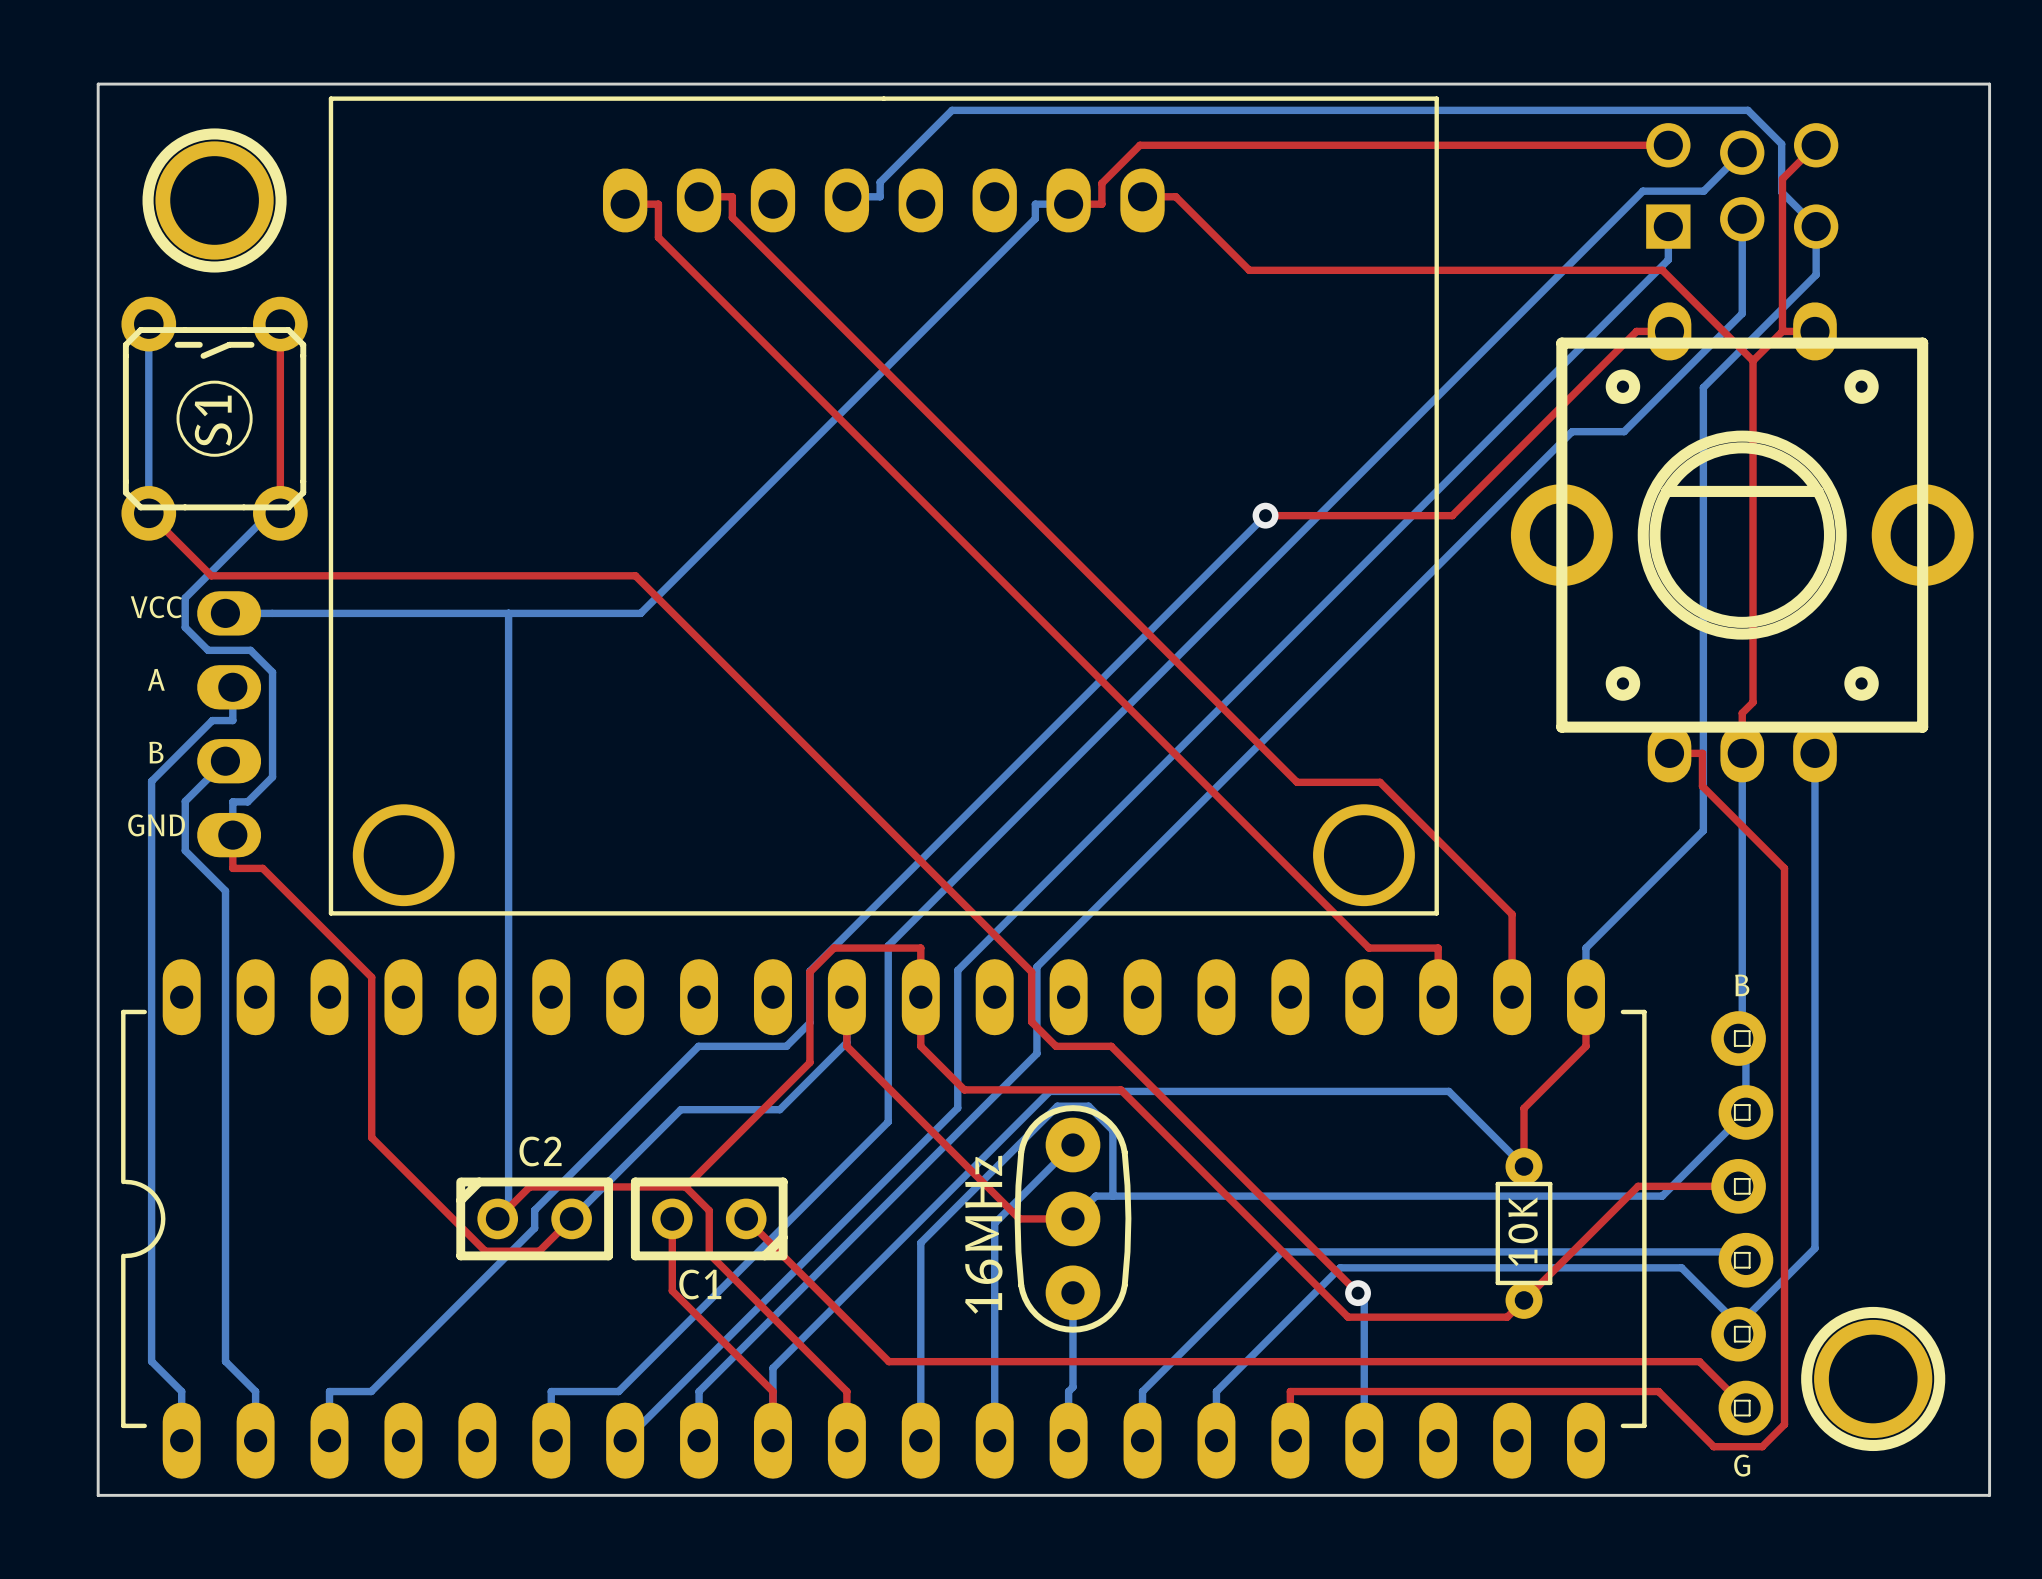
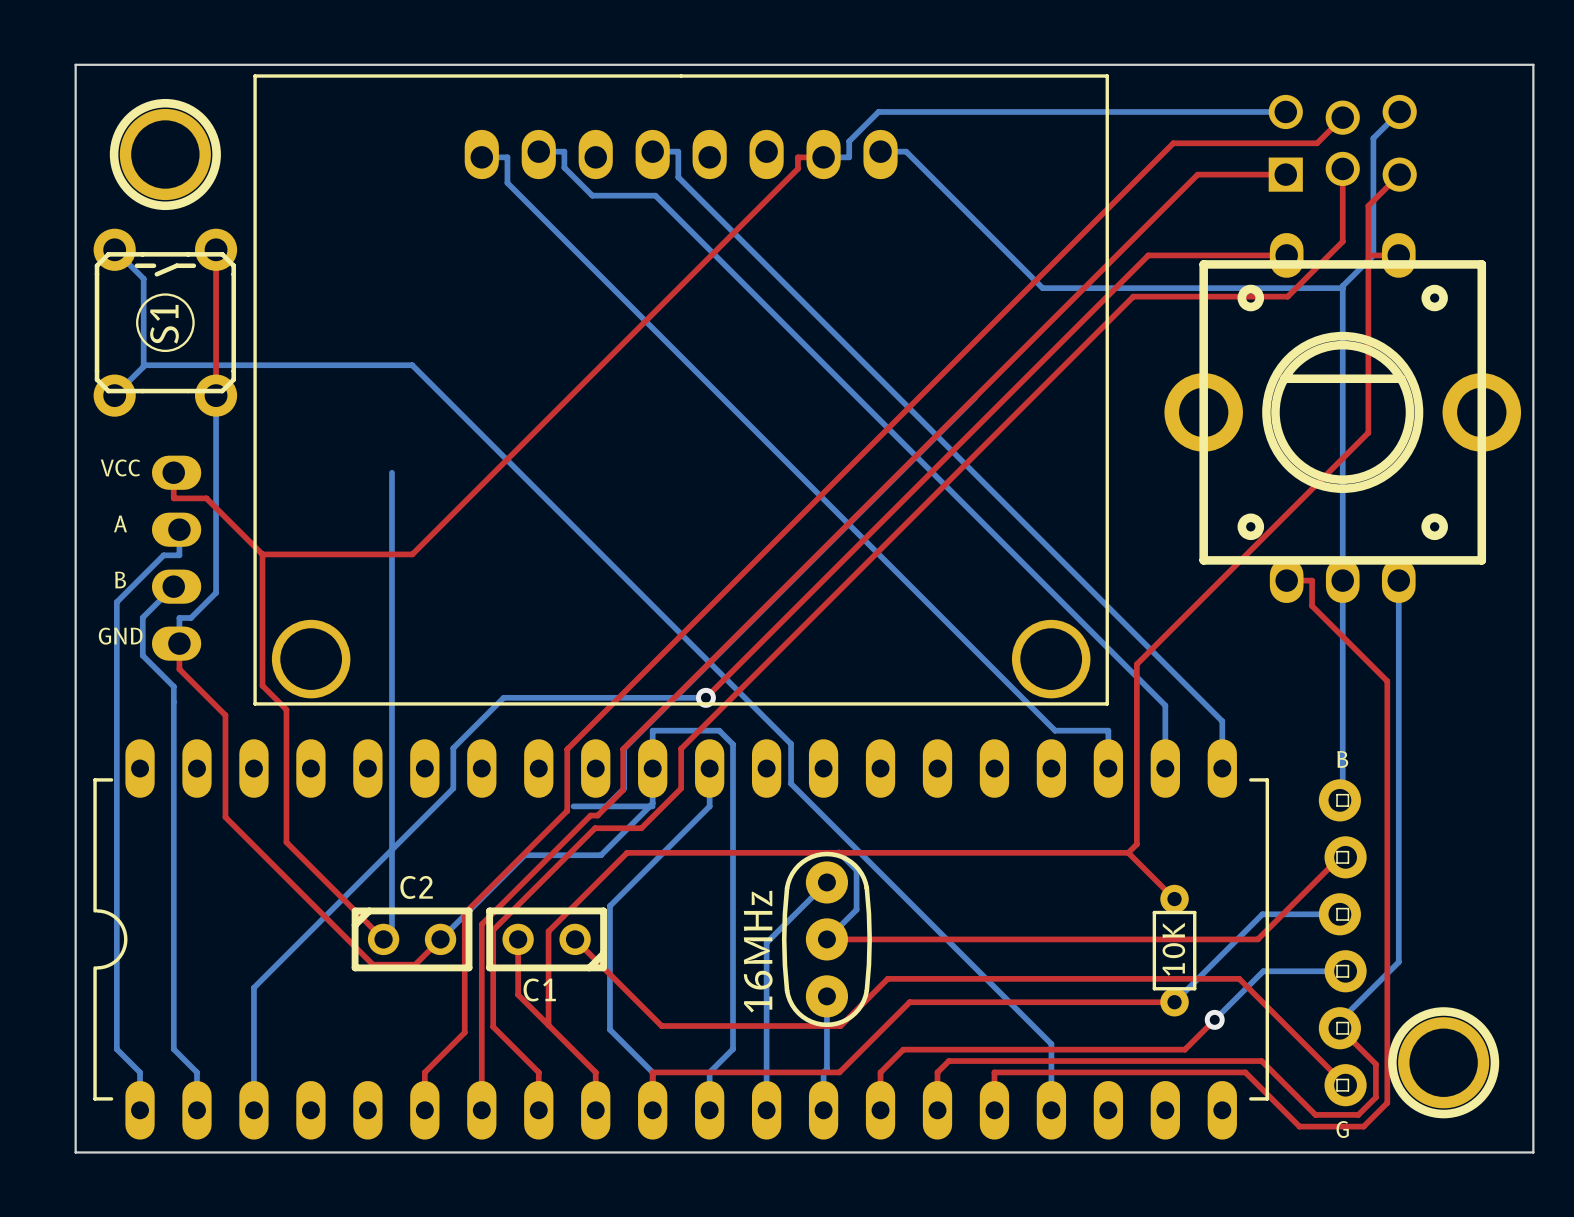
top track: (1668, 145) (1139, 145) (1101, 183) (1101, 204) (1068, 204) -> (262, 554) (412, 554) (797, 168) (797, 157) (823, 157)
bottom track: none -> (1399, 111) (1373, 138) (1373, 255) (1342, 286) (1342, 580)
top track: (1816, 145) (1782, 178) (1782, 331) (1753, 360) -> none
bottom track: (1742, 152) (1703, 191) (1642, 191) (888, 945) (888, 1121) (618, 1391) (551, 1391) (551, 1440) -> none
top track: none -> (1342, 117) (1317, 143) (1173, 143) (567, 749) (567, 810) (464, 913) (464, 1032) (424, 1072) (424, 1110)
bottom track: none -> (538, 151) (564, 151) (564, 167) (592, 195) (655, 195) (1165, 705) (1165, 768)
top track: (699, 196) (732, 196) (732, 217) (1297, 782) (1380, 782) (1512, 914) (1512, 997) -> none
bottom track: (880, 196) (880, 182) (952, 110) (1747, 110) (1781, 144) (1781, 192) (1816, 226) (1816, 274) (1703, 387) (1703, 830) (1585, 948) -> (678, 151) (678, 177) (1222, 721) (1222, 730)
bottom track: none -> (880, 151) (906, 151) (1042, 288) (1342, 288)
top track: (1142, 196) (1175, 196) (1249, 270) (1662, 270) (1753, 360) -> none
bottom track: none -> (481, 157) (507, 157) (507, 183) (1055, 730) (1108, 730) (1108, 768)
top track: (625, 204) (658, 204) (658, 237) (1369, 948) (1438, 948) (1438, 997) -> none
bottom track: (1068, 204) (1035, 204) (1035, 218) (640, 613) (225, 613) -> (823, 157) (849, 157) (849, 141) (878, 111) (1285, 111)
bottom track: (1742, 219) (1742, 313) (1624, 431) (1572, 431) (1036, 966) (1036, 1053) (699, 1391) (699, 1440) -> none
top track: none -> (1342, 168) (1342, 241) (1287, 296) (1133, 296) (681, 748) (681, 788) (641, 828) (595, 828) (493, 930) (493, 1026) (538, 1072) (538, 1110)
bottom track: (1668, 226) (1668, 259) (957, 970) (957, 1108) (625, 1440) -> none
top track: none -> (1285, 174) (1197, 174) (623, 749) (623, 790) (597, 815) (590, 815) (481, 924) (481, 1110)
top track: none -> (1399, 174) (1368, 205) (1368, 432) (1136, 664) (1136, 844) (1128, 852)
bottom track: (148, 324) (148, 513) -> (114, 249) (143, 278) (143, 366) (114, 395)
top track: (1636, 331) (1452, 515) (1265, 515) -> (1261, 255) (1148, 255) (705, 697)
top track: (1753, 360) (1753, 702) (1742, 713) (1742, 753) -> none
top track: (148, 513) (211, 575) (635, 575) (1031, 971) (1031, 1021) (1056, 1046) (1111, 1046) (1358, 1293) -> none
bottom track: (280, 513) (269, 513) (185, 598) (185, 627) (208, 650) (250, 650) (272, 672) (272, 777) -> (216, 395) (216, 592) (210, 598)
via: (1265, 515) -> none
top track: none -> (173, 472) (173, 498) (206, 498) (262, 554)
top track: (232, 868) (262, 868) (371, 977) -> (262, 554) (262, 685) (286, 709) (286, 753)
top track: none -> (179, 669) (225, 715) (225, 817) (372, 964) (415, 964)
top track: (1784, 868) (1784, 1424) -> (1375, 669) (1387, 681) (1387, 1102) (1363, 1126) (1299, 1126) (1245, 1072)
via: none -> (705, 697)
top track: (846, 997) (846, 1046) (1019, 1218) (1072, 1218) -> (1345, 857) (1339, 857) (1257, 939) (826, 939)
bottom track: none -> (709, 768) (709, 806) (609, 906) (609, 1029) (652, 1072) (652, 1110)
top track: (1585, 997) (1585, 1046) (1524, 1108) (1524, 1166) -> (1128, 852) (1174, 899)
bottom track: (1738, 1038) (1745, 1045) (1745, 1112) (1662, 1196) (1095, 1196) -> none
bottom track: (744, 1046) (698, 1046) (534, 1210) (534, 1228) (371, 1391) (329, 1391) -> (705, 697) (503, 697) (453, 748) (453, 788) (253, 987) (253, 1072)
top track: (371, 1092) (371, 1137) (485, 1251) (539, 1251) -> (286, 842) (383, 939)
bottom track: (1088, 1106) (1057, 1106) (920, 1242) (920, 1391) -> (652, 768) (652, 730) (719, 730) (733, 744) (733, 1049) (709, 1072)
top track: none -> (1128, 852) (627, 852) (548, 931) (548, 1025)
bottom track: (1111, 1129) (1112, 1196) -> (856, 870) (856, 909) (844, 921)
bottom track: (1524, 1166) (1448, 1091) (1049, 1091) (772, 1368) (772, 1440) -> none
top track: (685, 1186) (709, 1210) (709, 1253) (846, 1391) -> (1174, 1002) (909, 1002) (839, 1072) (652, 1072)
top track: (685, 1186) (529, 1186) (497, 1218) -> none
bottom track: none -> (1339, 914) (1262, 914) (1174, 1002)
top track: (1738, 1186) (1638, 1186) (1507, 1317) (1348, 1317) (1120, 1089) (964, 1089) (920, 1046) (920, 948) (833, 948) (809, 972) (809, 1062) (685, 1186) -> none
bottom track: (1745, 1260) (1737, 1251) (1282, 1251) (1142, 1391) (1142, 1440) -> (1345, 971) (1263, 971) (1214, 1019)
bottom track: (1358, 1293) (1364, 1299) (1364, 1354) -> (143, 365) (412, 365) (791, 744) (791, 783) (1051, 1044)
via: (1358, 1293) -> none
top track: none -> (1214, 1019) (1184, 1049) (903, 1049) (880, 1072) (880, 1110)
via: none -> (1214, 1019)
top track: (858, 1331) (888, 1361) (1699, 1361) -> (661, 1026) (840, 1026) (887, 978) (1239, 978) (1309, 1049)
bottom track: (1738, 1334) (1738, 1324) (1681, 1267) (1340, 1267) (1216, 1391) (1216, 1440) -> none
top track: none -> (1339, 1028) (1375, 1064) (1375, 1097)
top track: (1615, 1391) (1658, 1391) (1713, 1446) (1762, 1446) -> (937, 1110) (937, 1072) (948, 1061) (1261, 1061) (1315, 1114) (1358, 1114)

